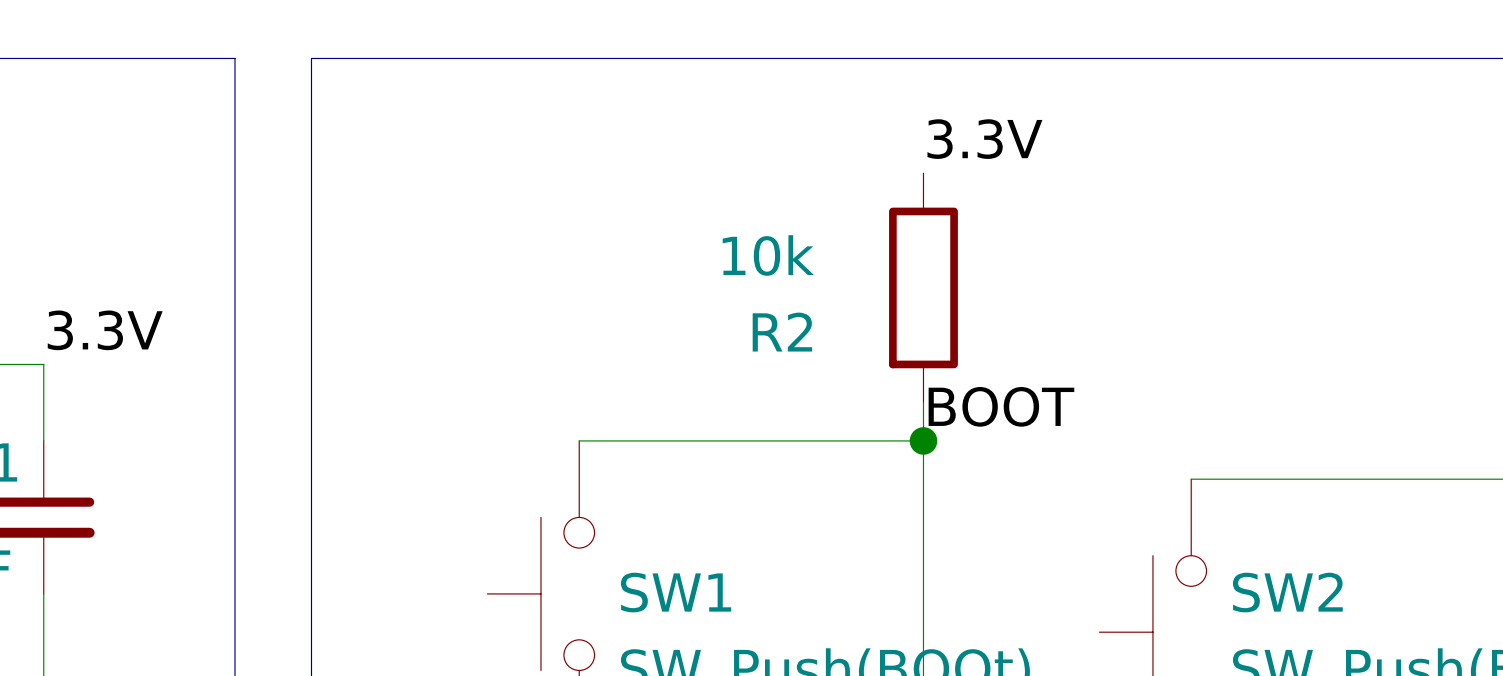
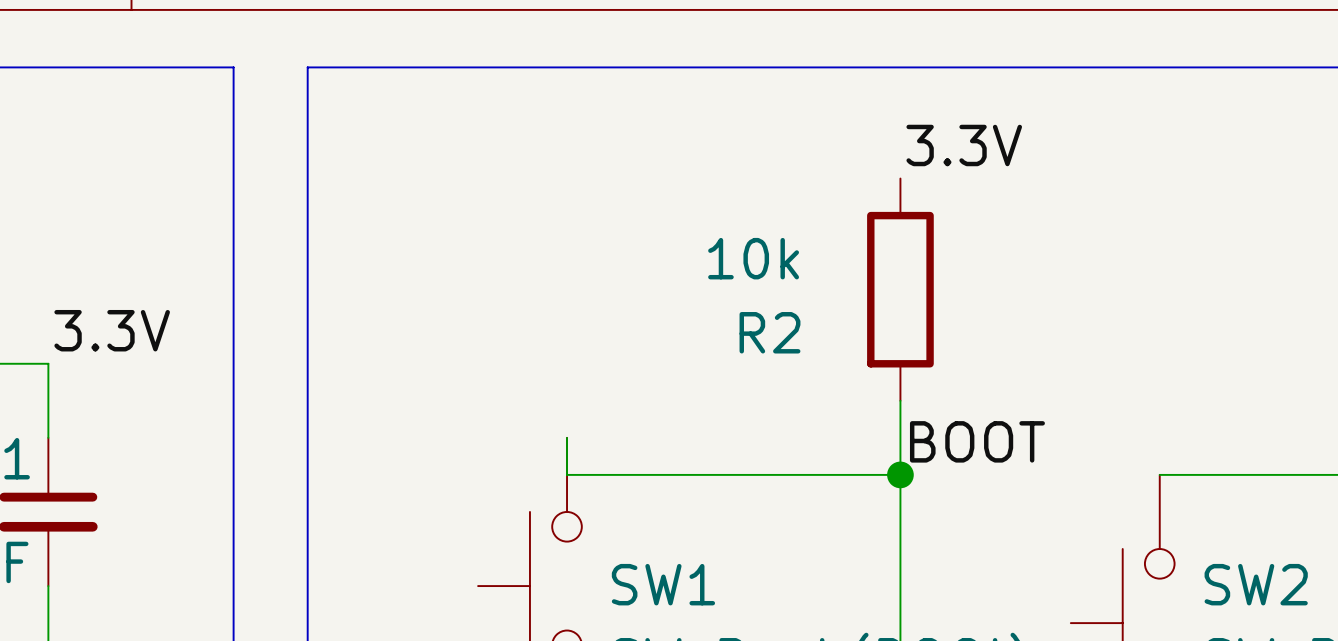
label position: BOOT (1001, 406) -> BOOT (977, 441)
wire: (579, 440) (923, 440) -> (567, 437) (567, 474) (900, 474)
junction position: (923, 440) -> (900, 474)

